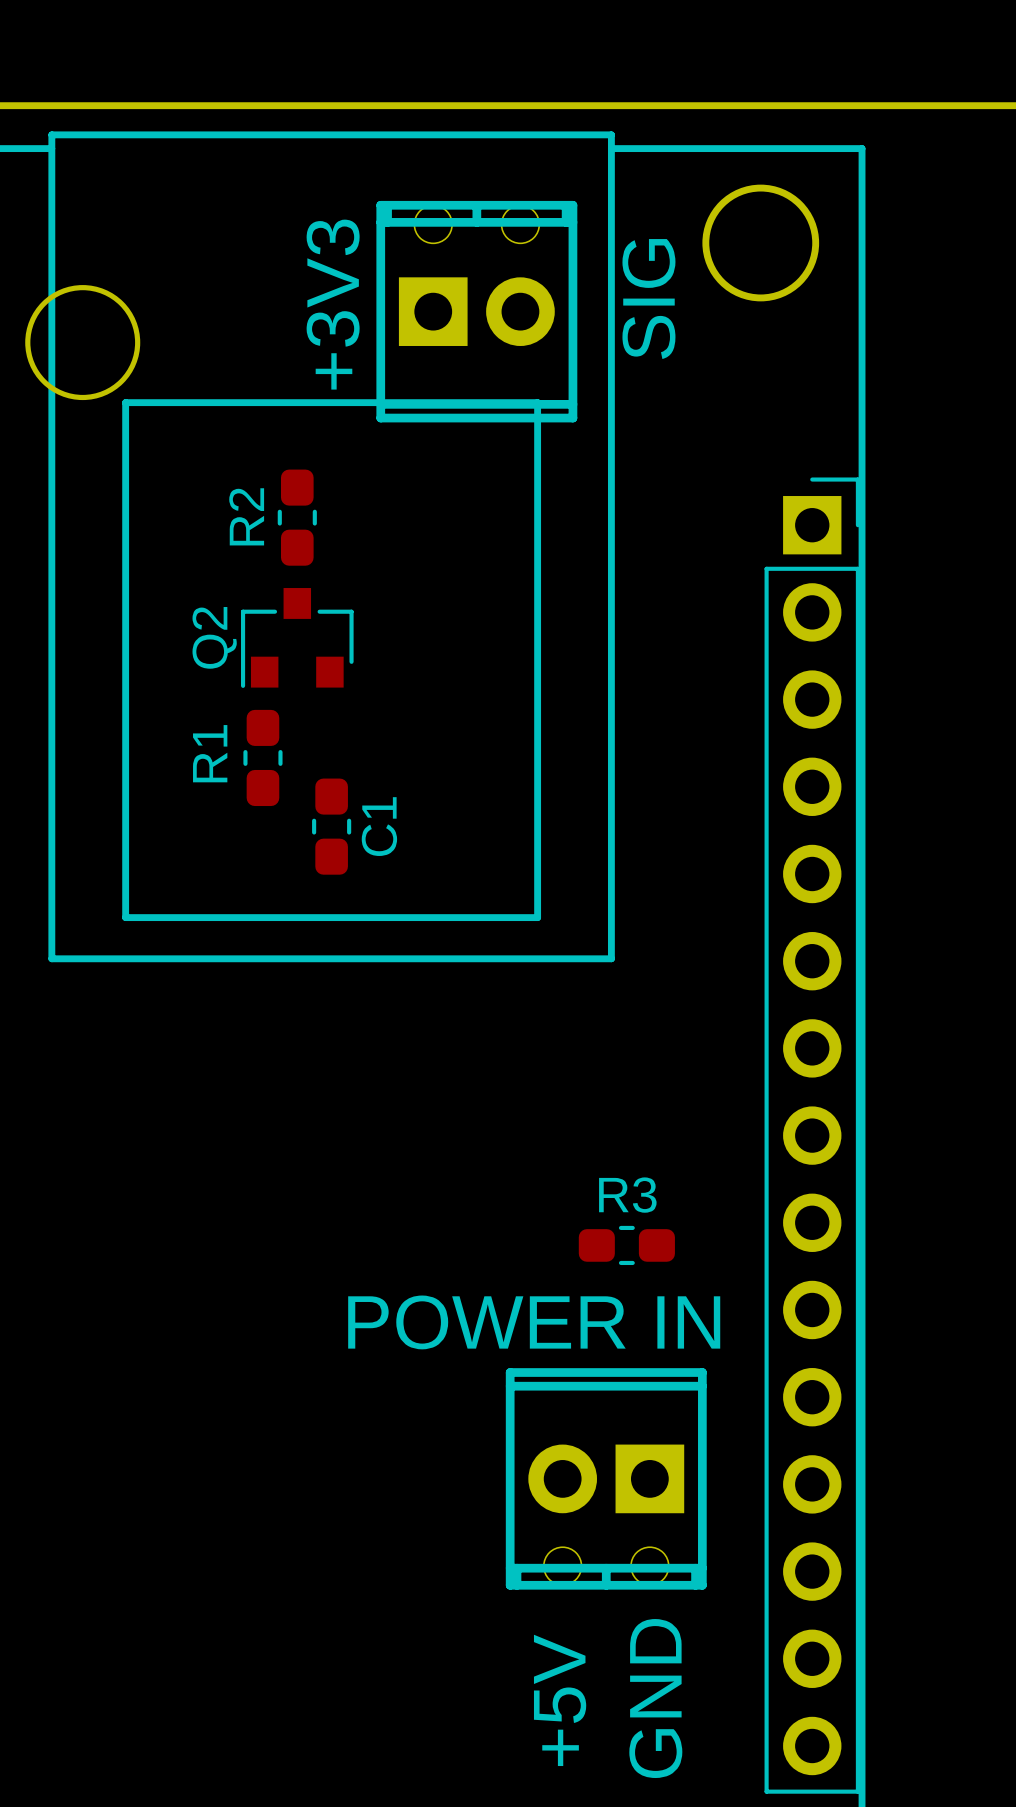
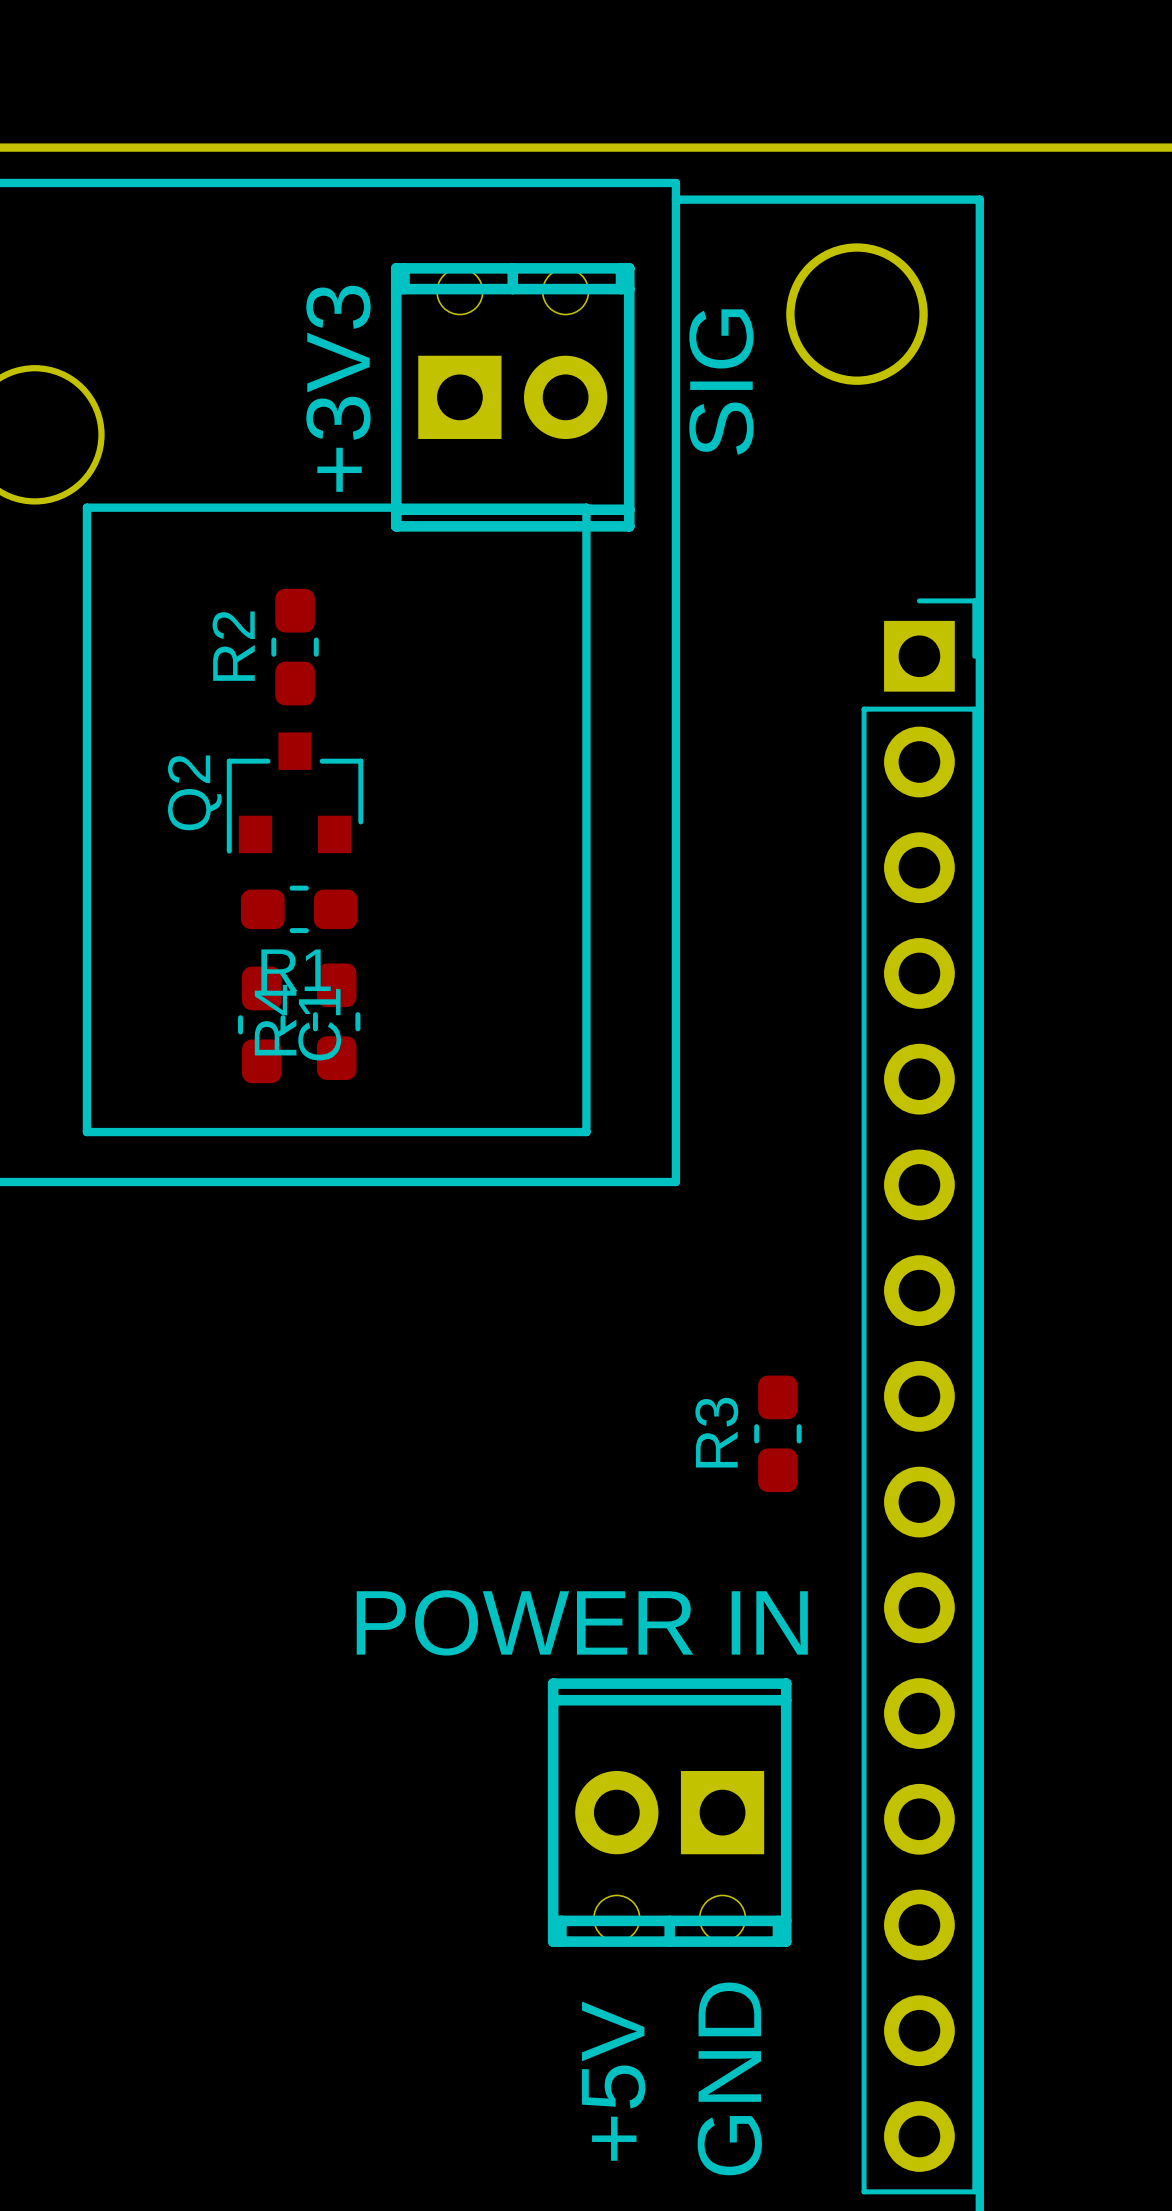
R1 name position: R1 (210, 753) -> R1 (296, 970)
R1 rotation: 0° (262, 757) -> 90° clockwise (299, 909)
C1 name: C1 (379, 826) -> R4 (275, 1020)
C1: none -> (261, 1024)
R3 name position: R3 (627, 1195) -> R3 (716, 1432)
R3 rotation: 0° (626, 1245) -> 90° clockwise (777, 1433)
R3 position: (626, 1245) -> (777, 1433)

